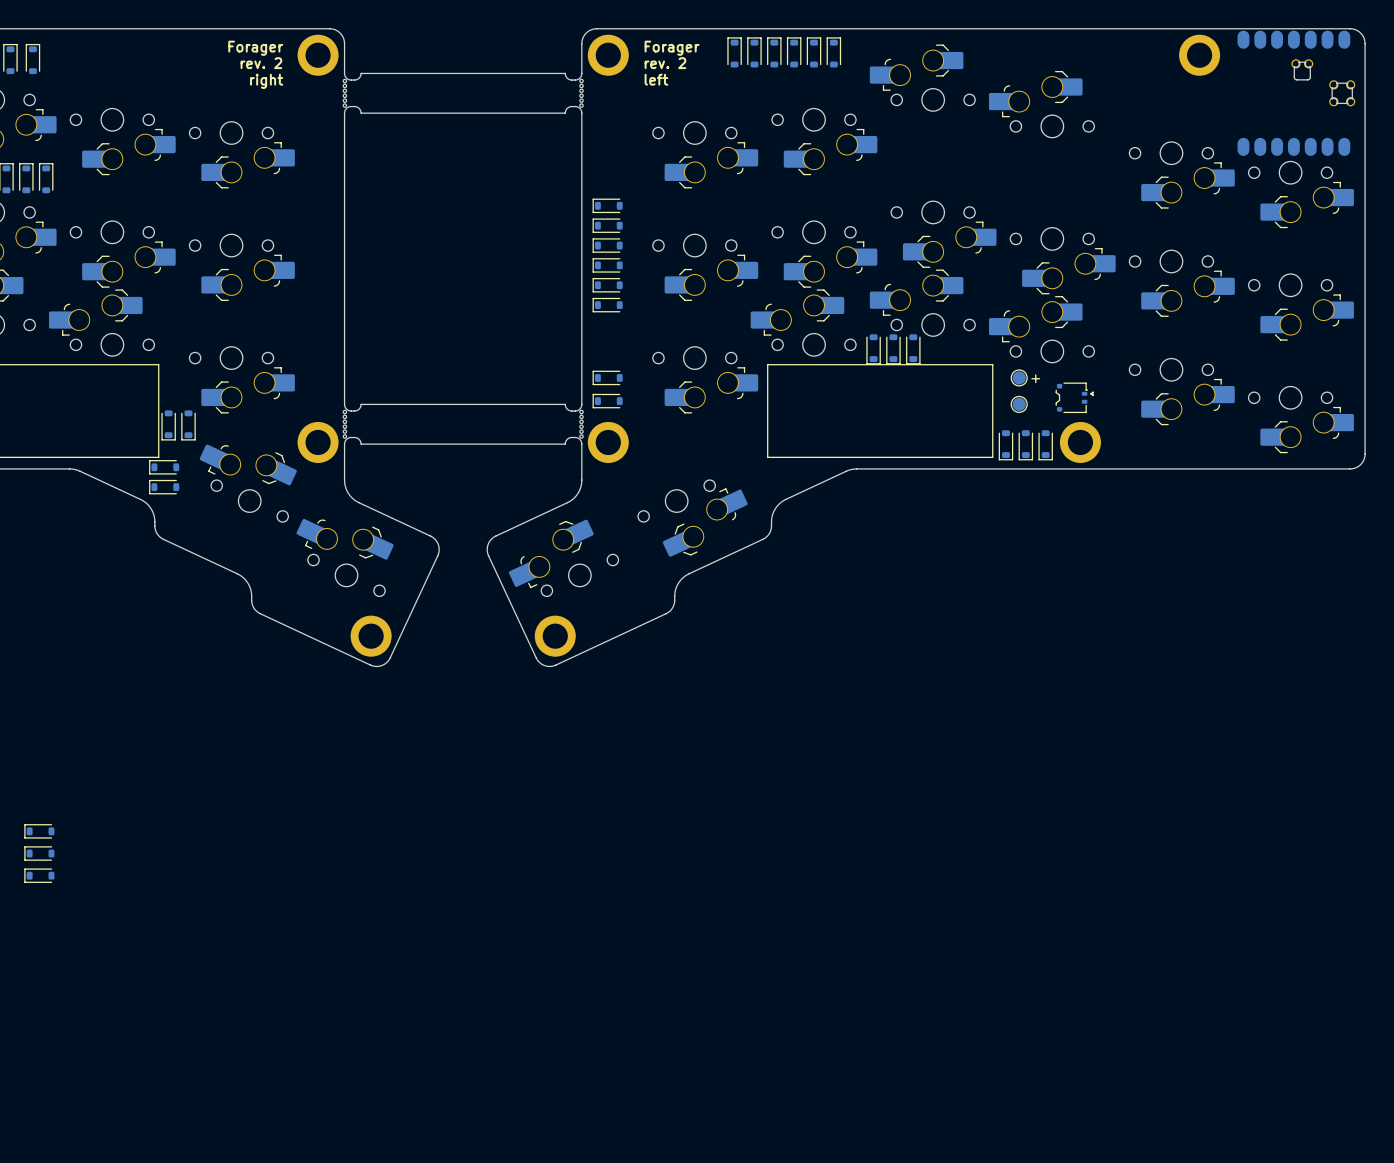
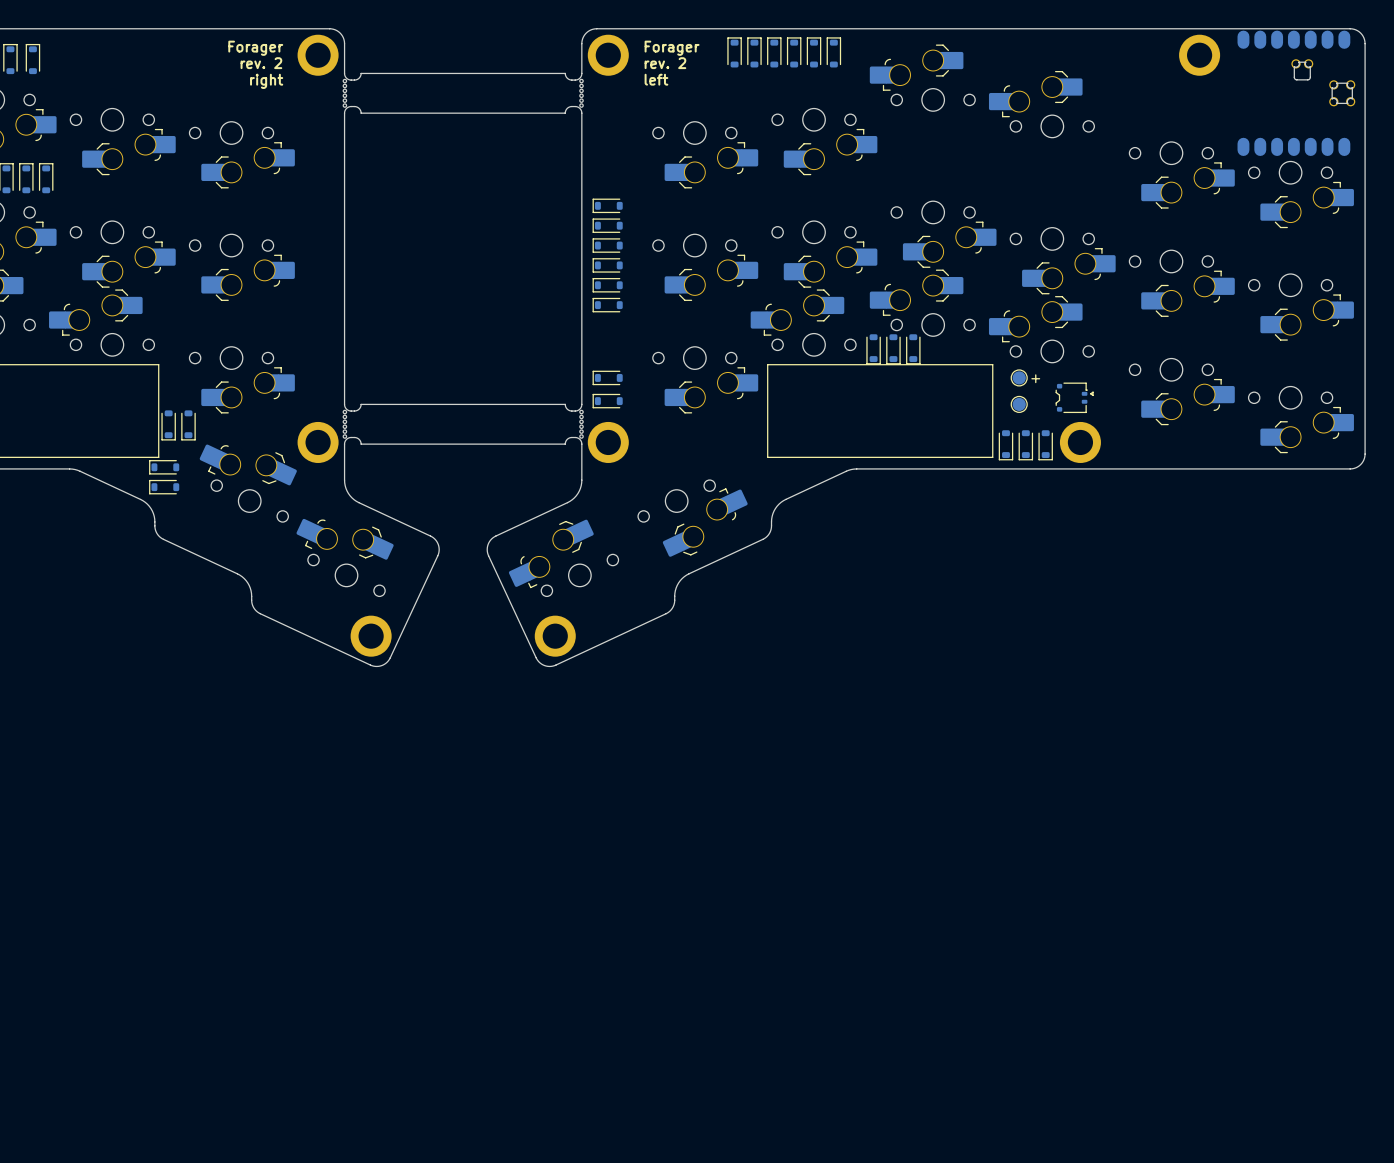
part: (39, 831) -> none
part: (39, 853) -> none
part: (39, 875) -> none

